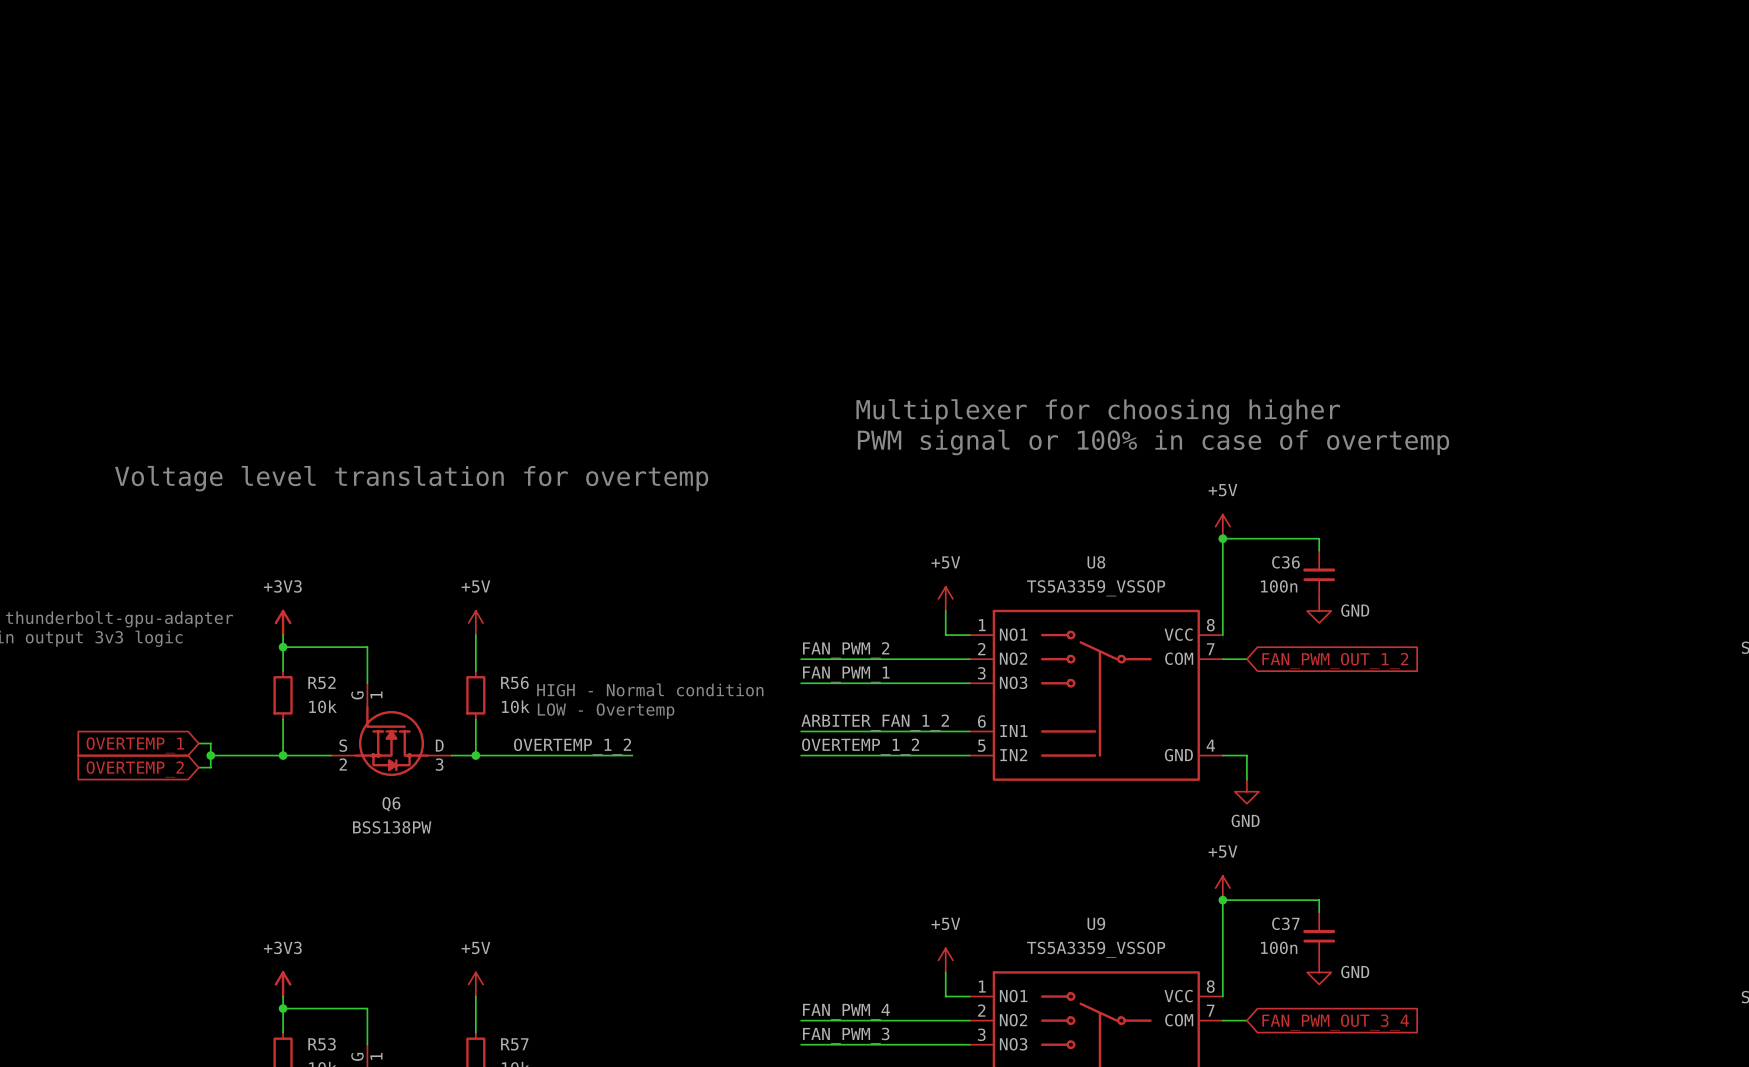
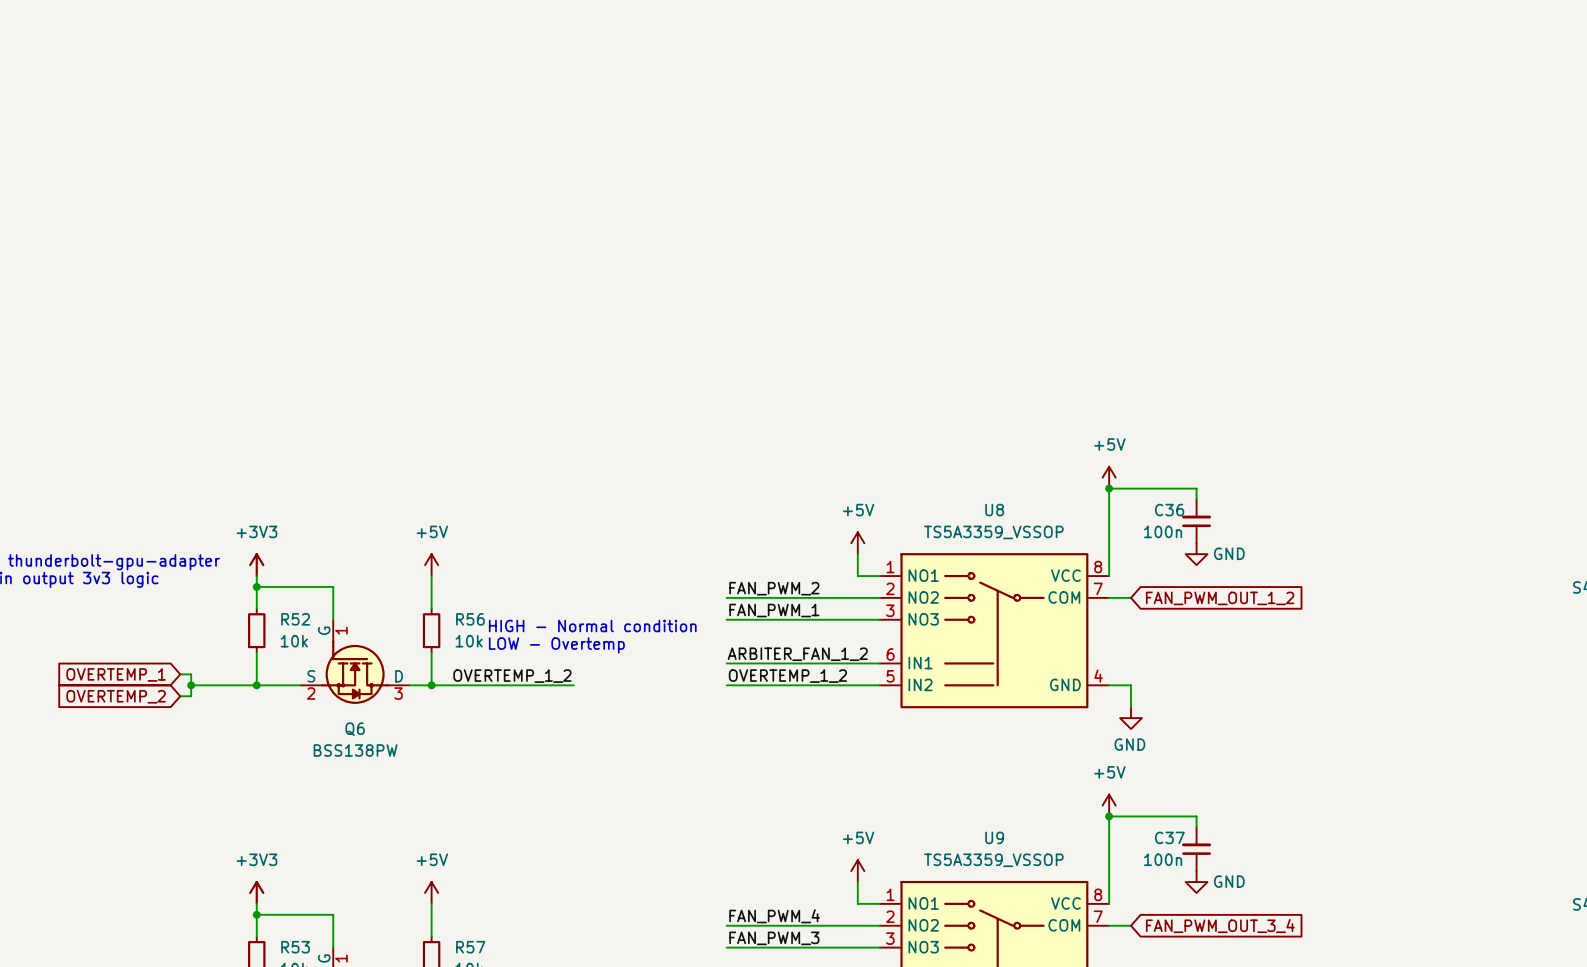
text: Multiplexer for choosing higher (1098, 411) -> none
text: PWM signal or 100% in case of overtemp (1153, 442) -> none
text: Voltage level translation for overtemp (411, 478) -> none

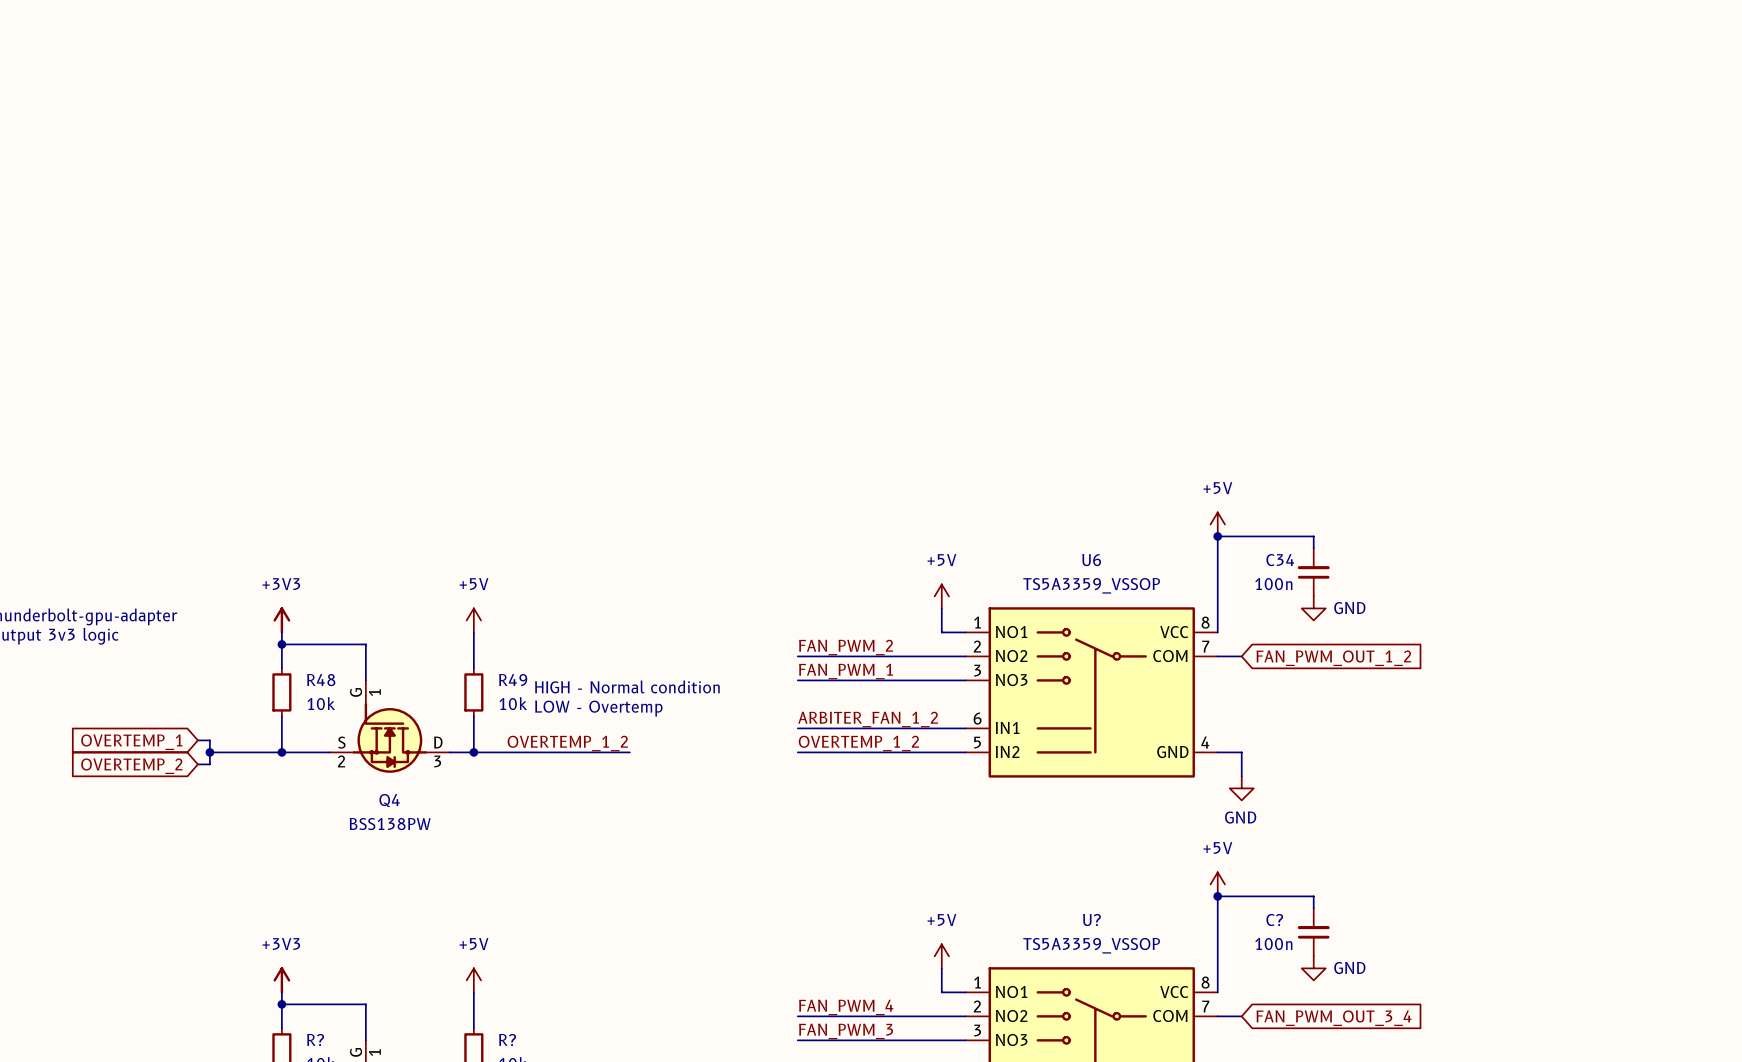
U8 name: U8 (994, 510) -> U6 (1091, 560)
C36 name: C36 (1169, 510) -> C34 (1280, 560)
R52 name: R52 (295, 619) -> R48 (321, 680)
R56 name: R56 (470, 619) -> R49 (513, 680)
Q6 name: Q6 (355, 729) -> Q4 (389, 800)
U9 name: U9 (994, 837) -> U? (1091, 920)
C37 name: C37 (1169, 837) -> C? (1274, 920)
R53 name: R53 (295, 947) -> R? (315, 1039)
R57 name: R57 (470, 947) -> R? (507, 1039)

